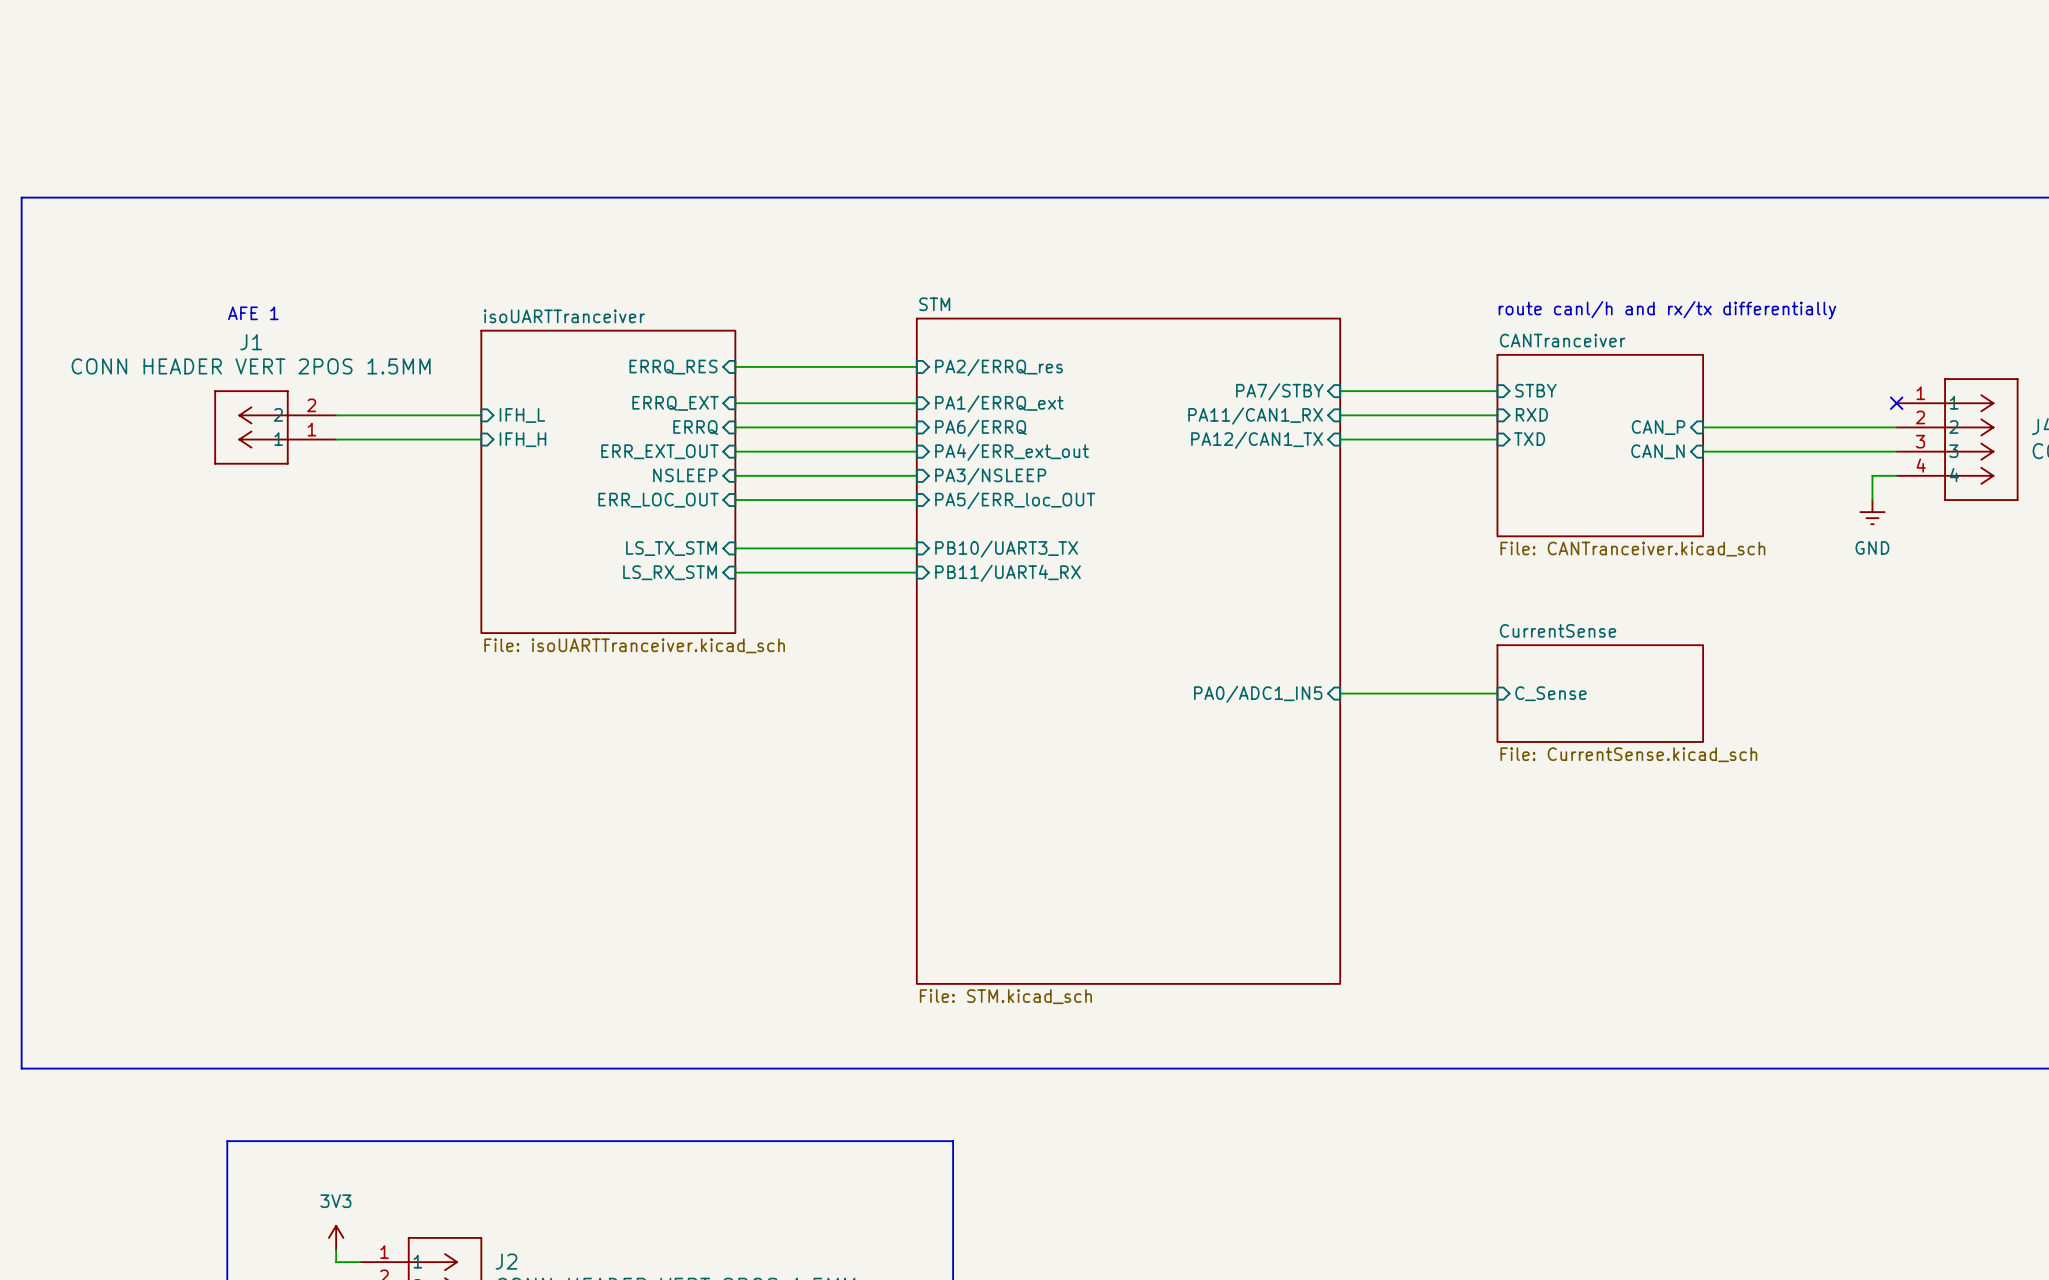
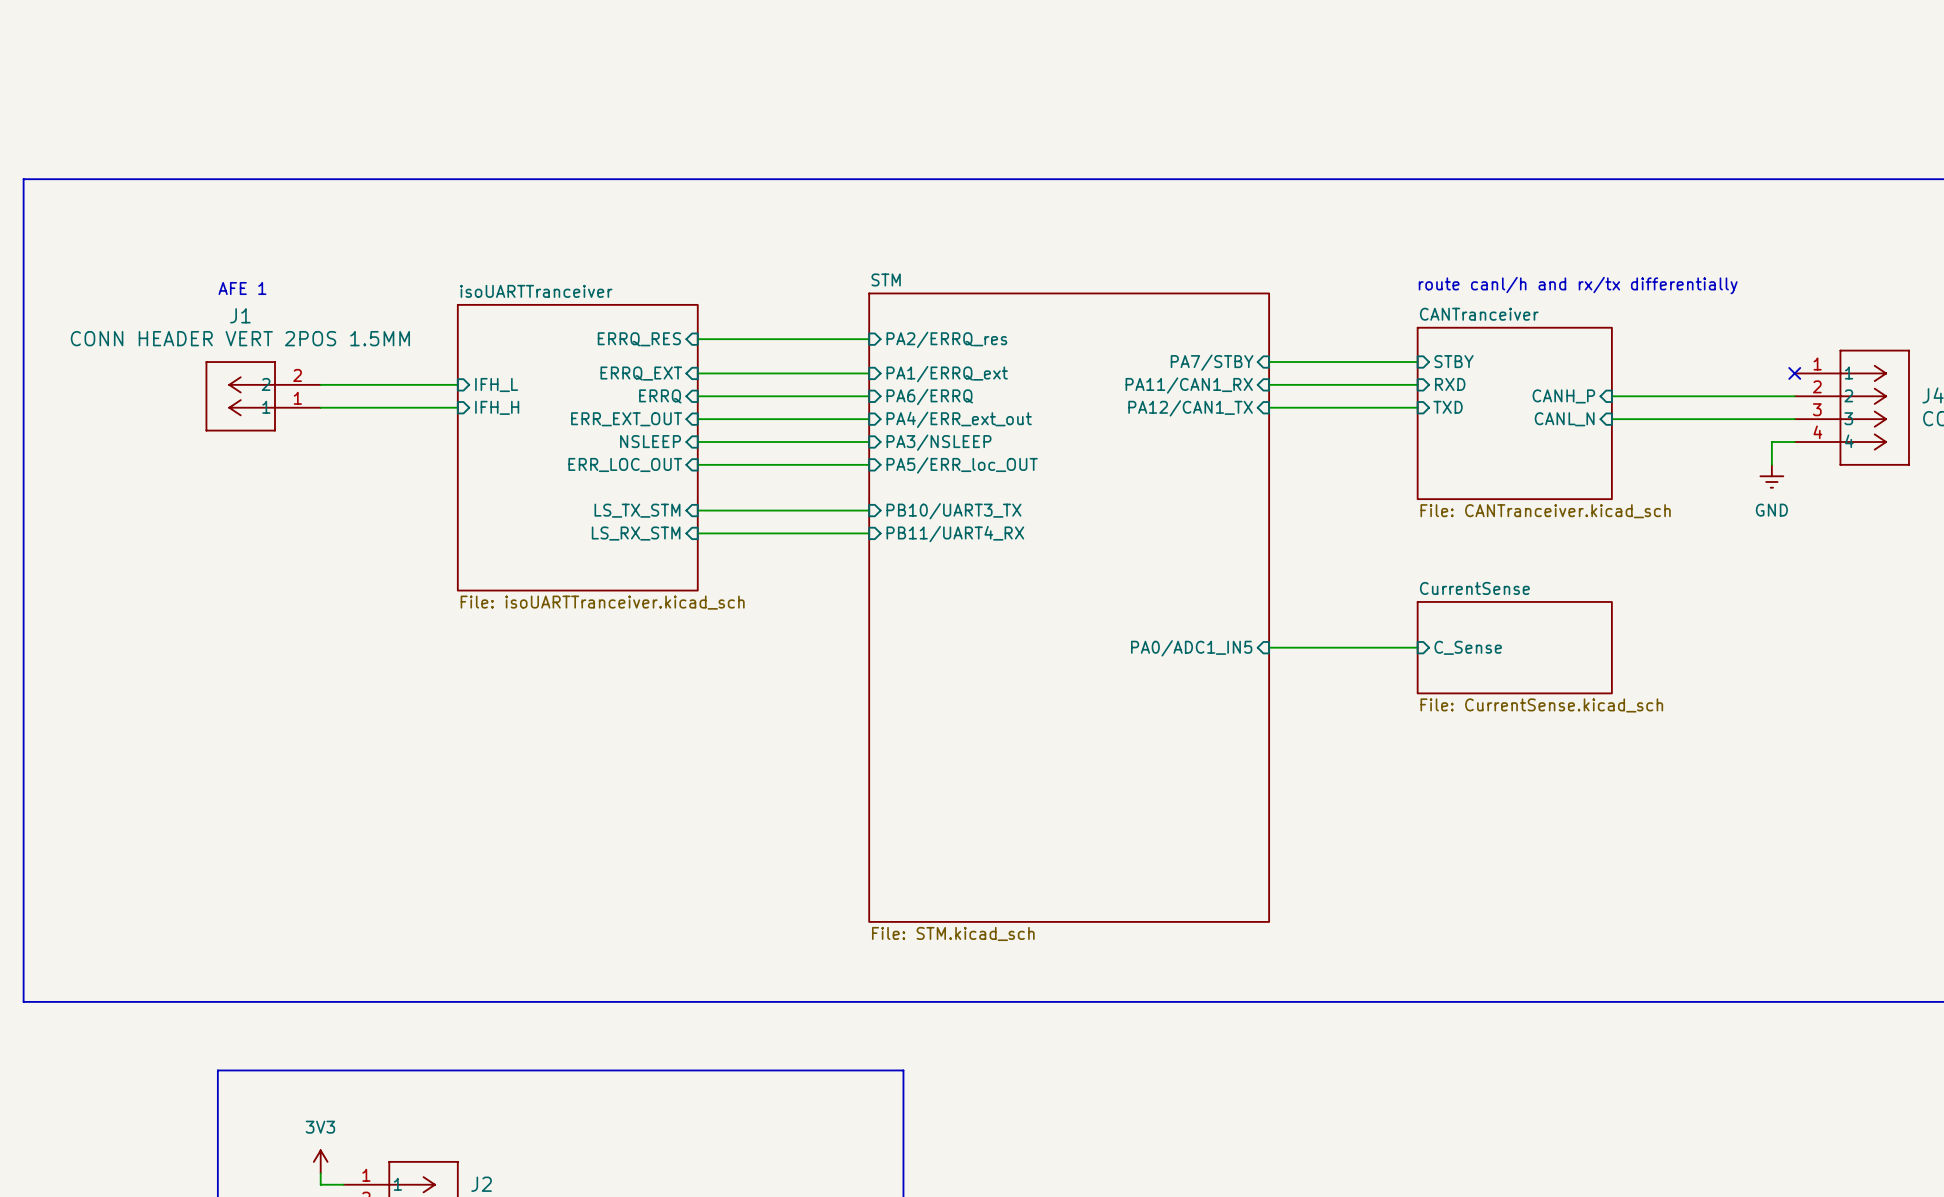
sheet pin: CAN_P (1658, 427) -> CANH_P (1563, 396)
sheet pin: CAN_N (1657, 451) -> CANL_N (1564, 419)

